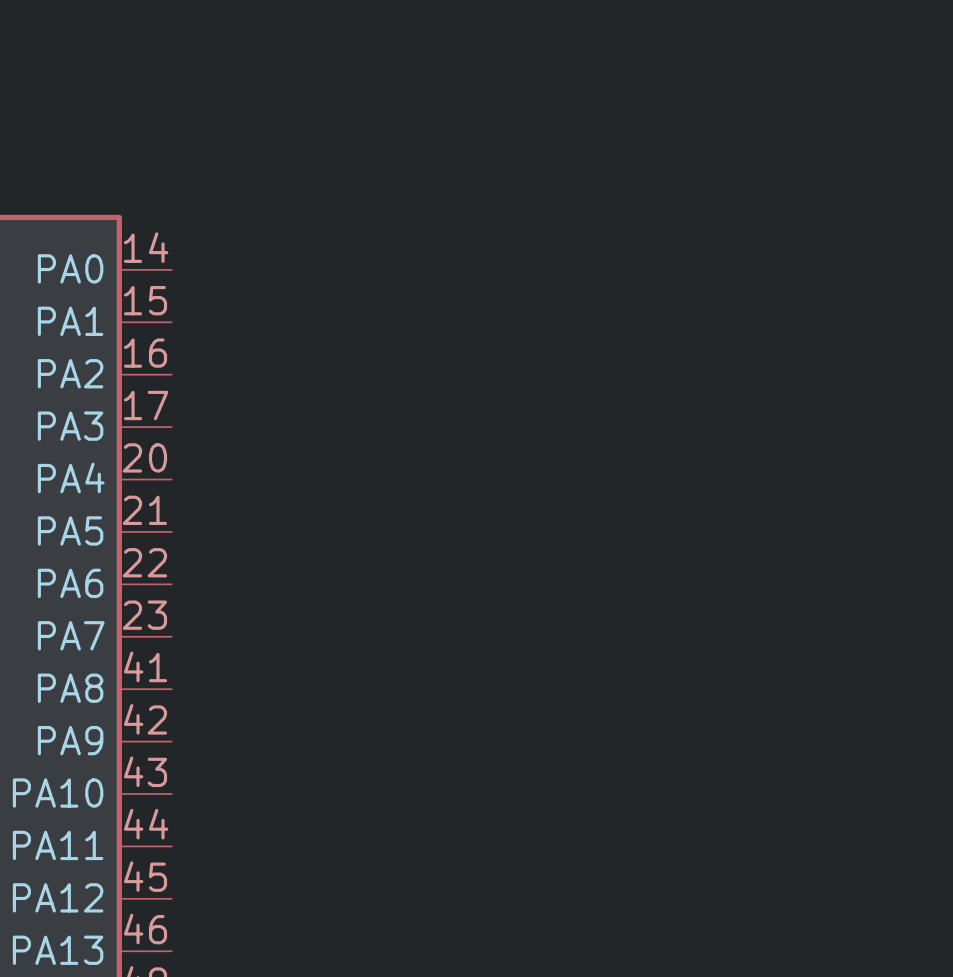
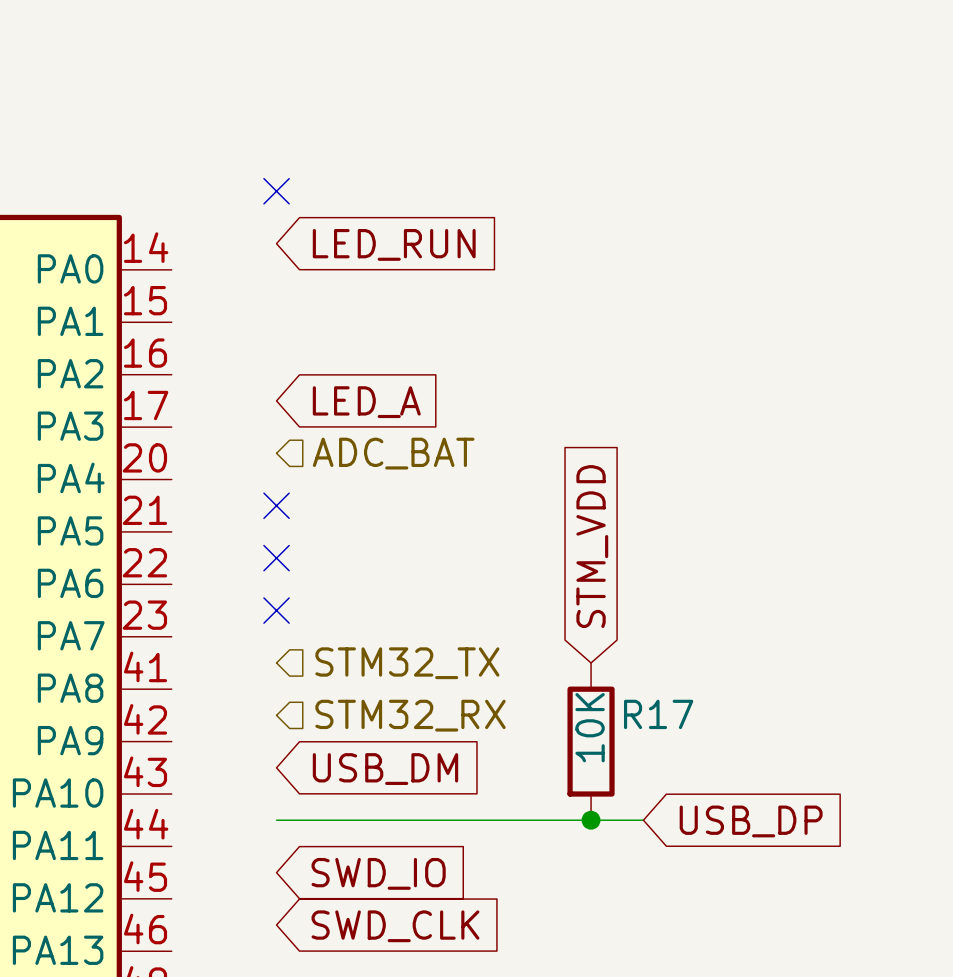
no-connect mark: none -> (276, 191)
global label: none -> LED_RUN (394, 244)
global label: none -> LED_A (366, 402)
hierarchical label: none -> ADC_BAT (393, 453)
no-connect mark: none -> (276, 505)
global label: none -> STM_VDD (592, 546)
no-connect mark: none -> (276, 558)
no-connect mark: none -> (276, 610)
hierarchical label: none -> STM32_TX (407, 663)
hierarchical label: none -> STM32_RX (410, 715)
R17: none -> 10K (591, 741)
global label: none -> USB_DM (385, 769)
wire: none -> (276, 820) (643, 820)
junction: none -> (591, 820)
global label: none -> USB_DP (751, 821)
global label: none -> SWD_IO (378, 873)
global label: none -> SWD_CLK (395, 926)

